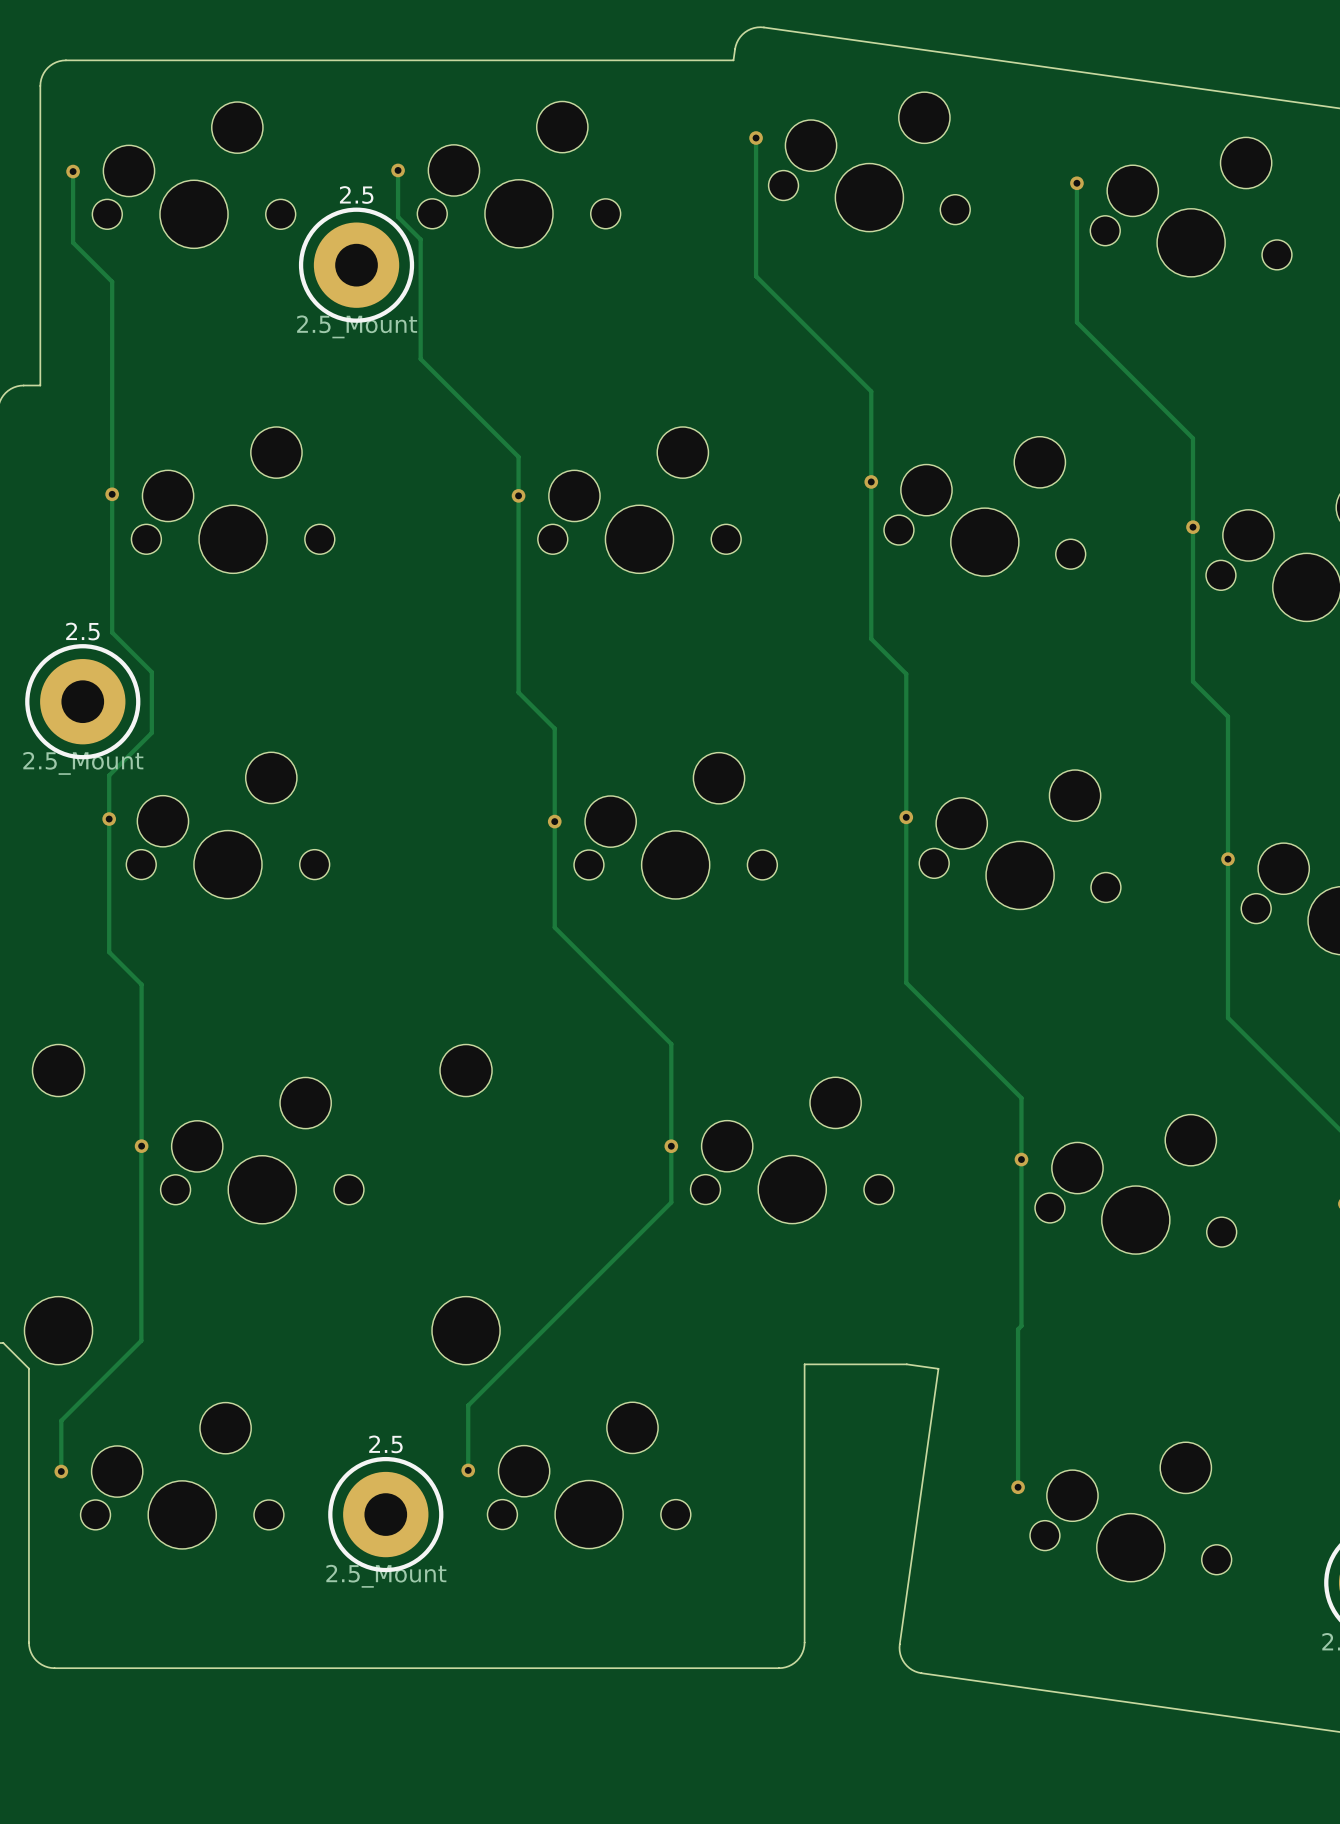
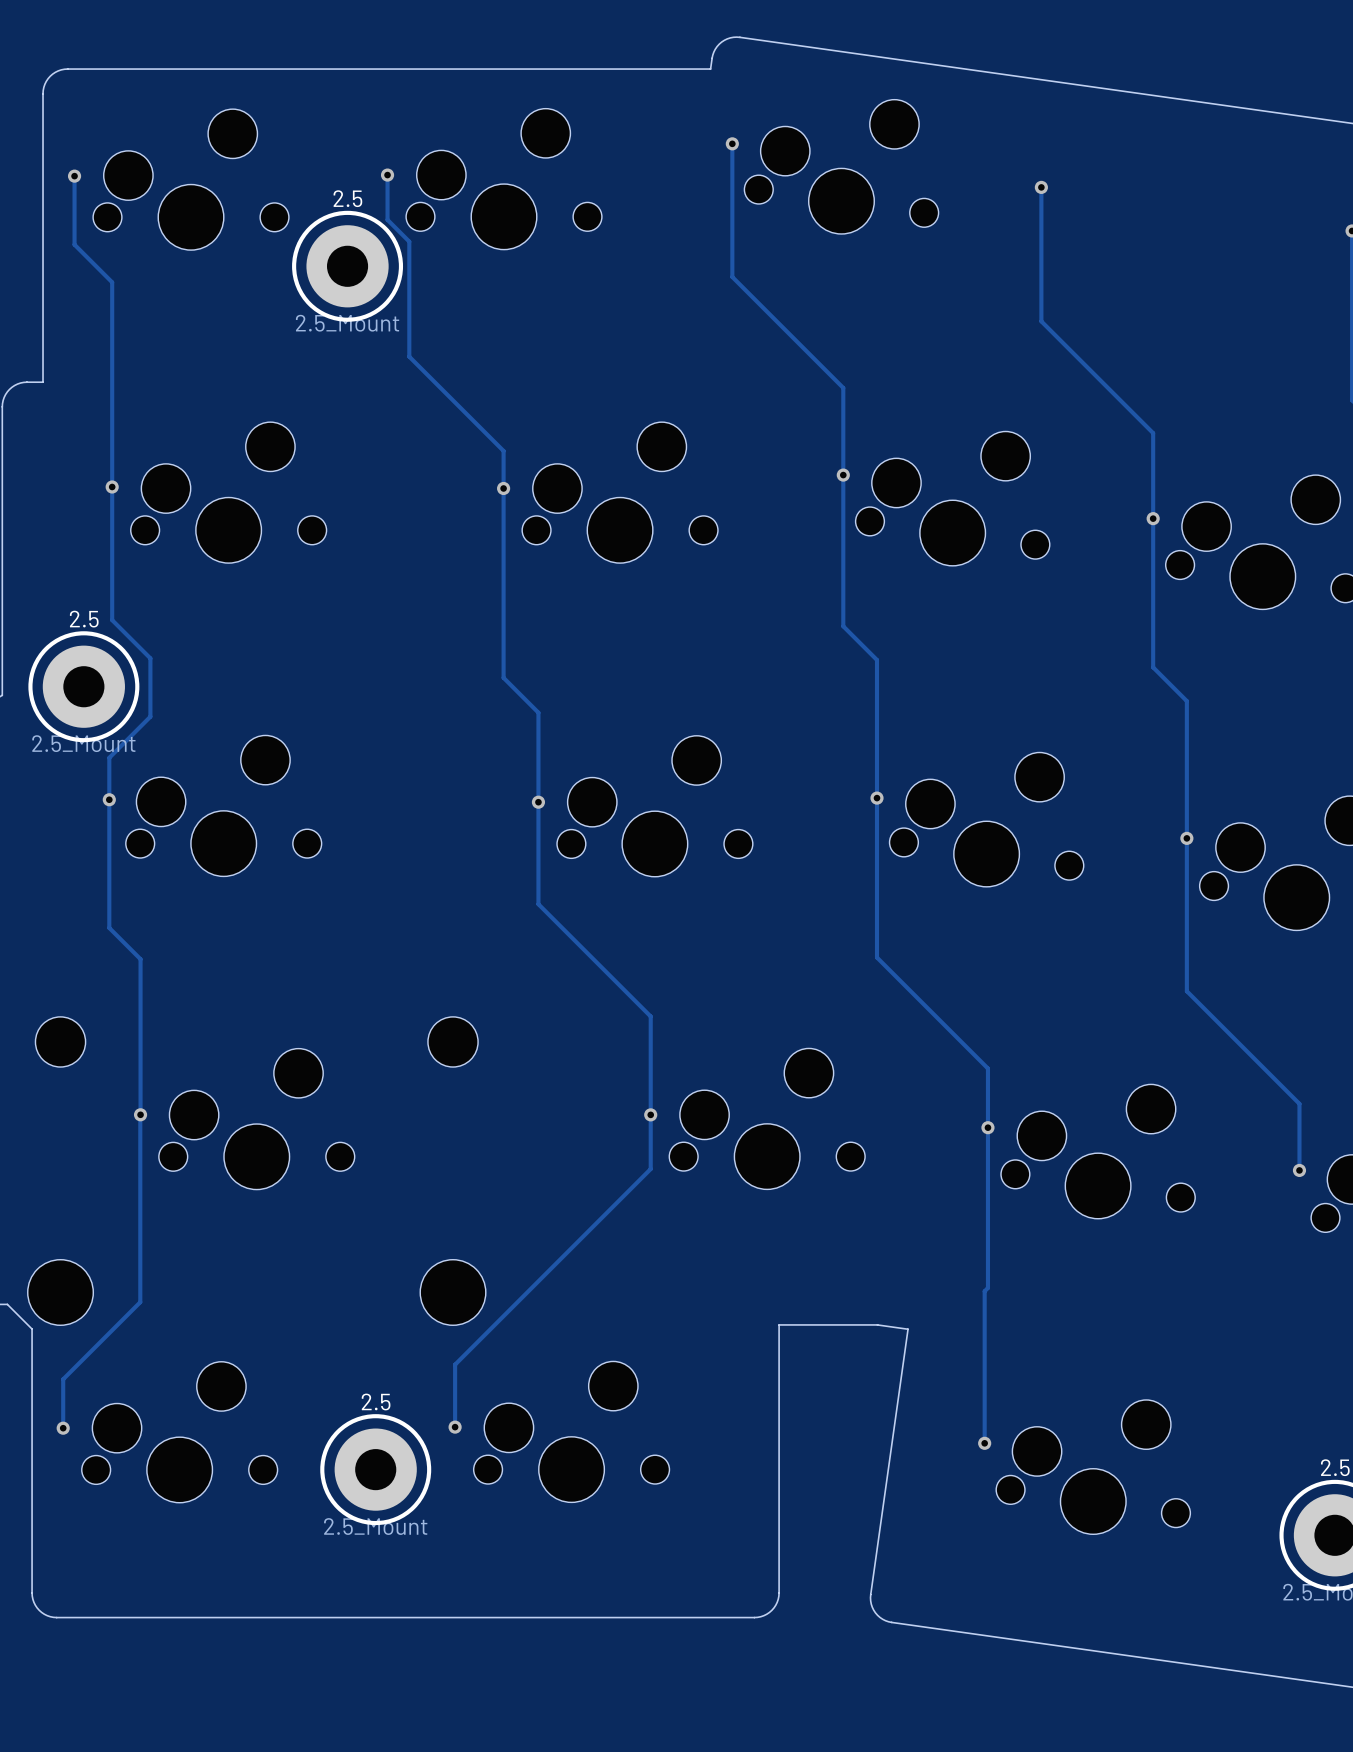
part: (1191, 207) -> none

